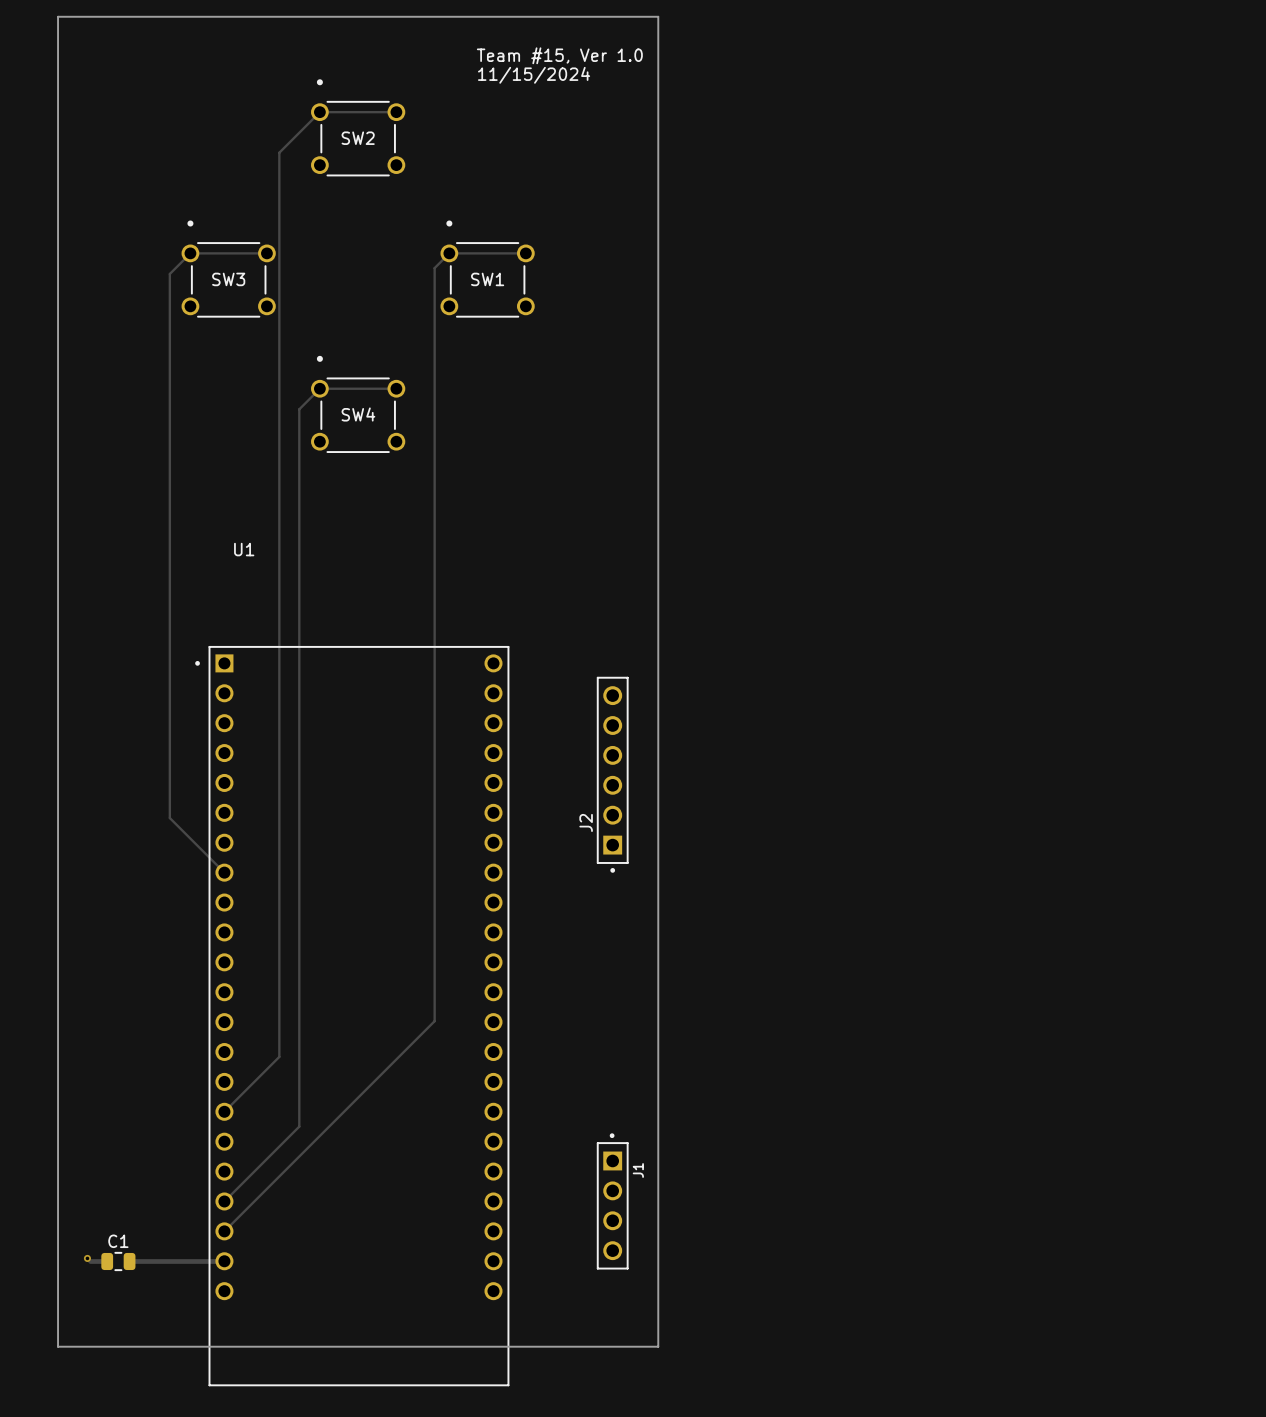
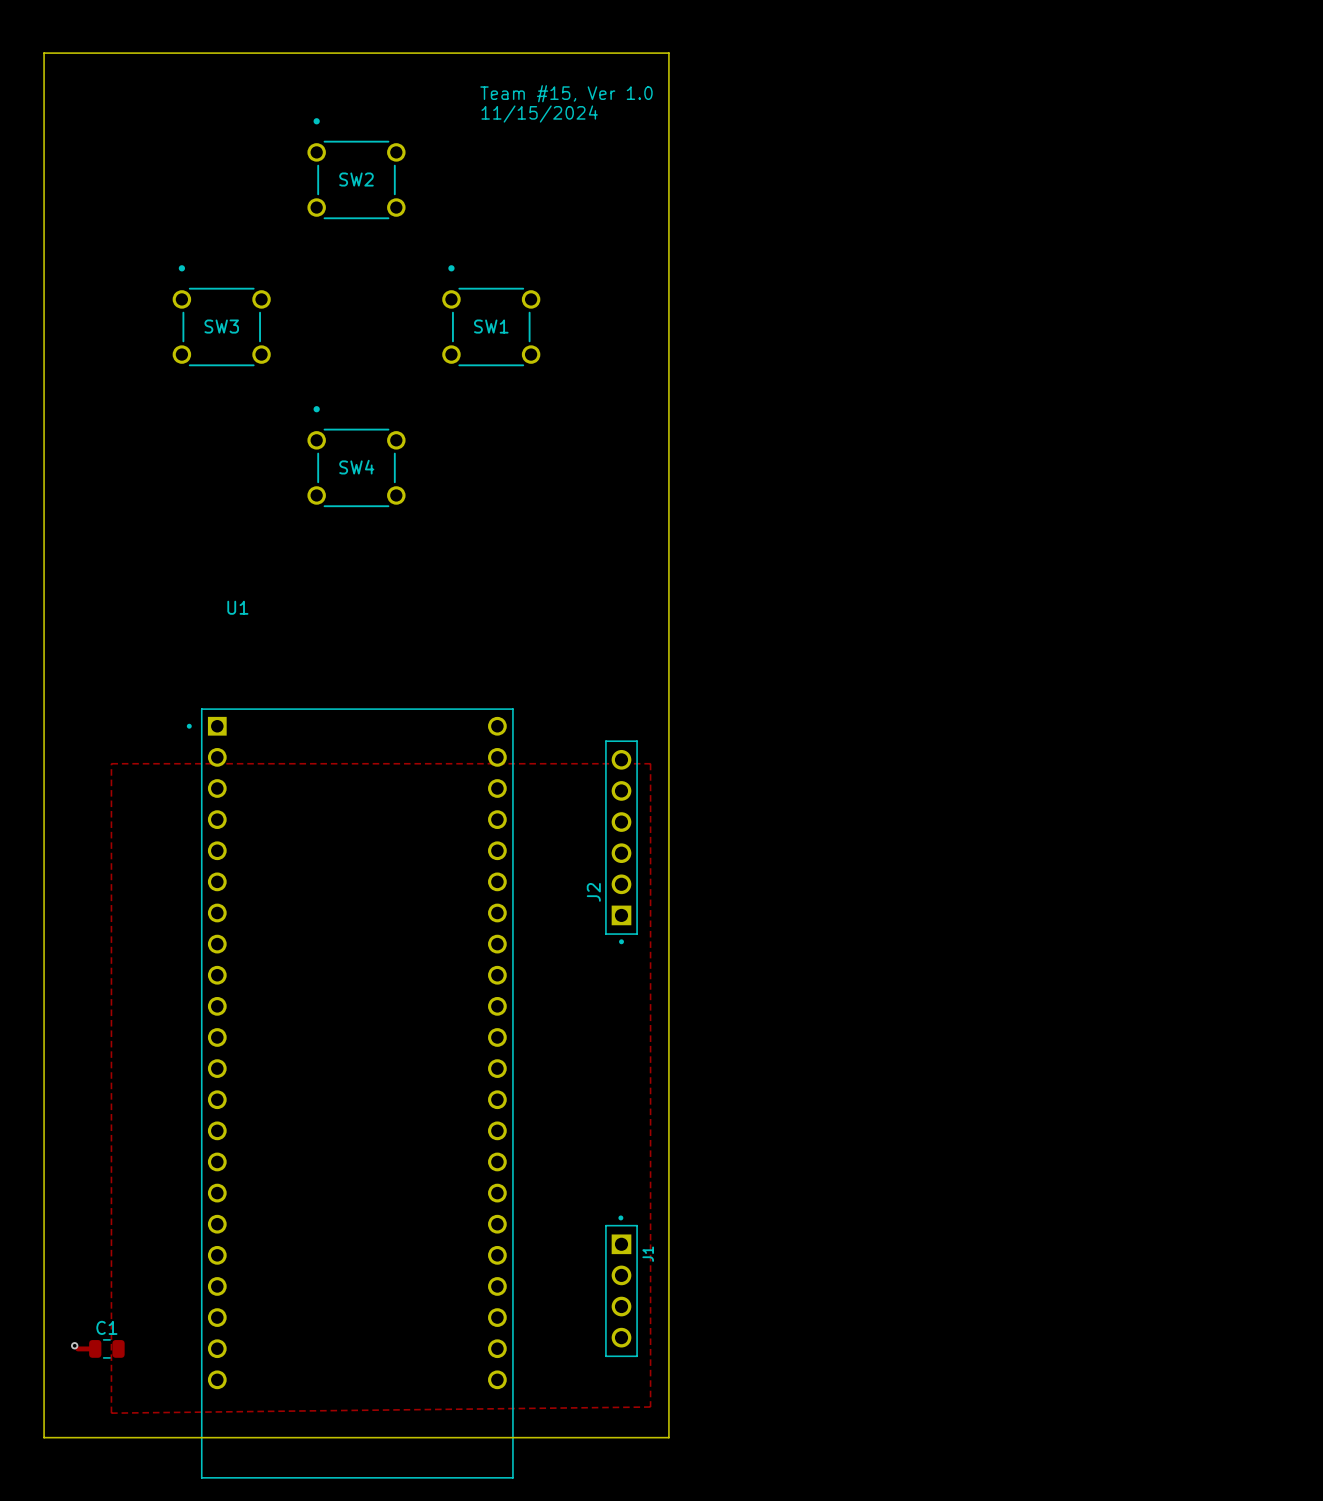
track: (396, 112) (319, 112) (279, 152) (279, 1056) (224, 1111) -> none
track: (266, 253) (190, 253) (169, 273) (169, 818) (224, 872) -> none
track: (525, 253) (449, 253) (434, 268) (434, 1021) (224, 1231) -> none
track: (396, 388) (319, 388) (299, 409) (299, 1126) (224, 1201) -> none
zone outline: none -> (111, 763) (111, 1413) (650, 1407) (650, 763) (111, 763)
track: (129, 1261) (224, 1261) -> none

